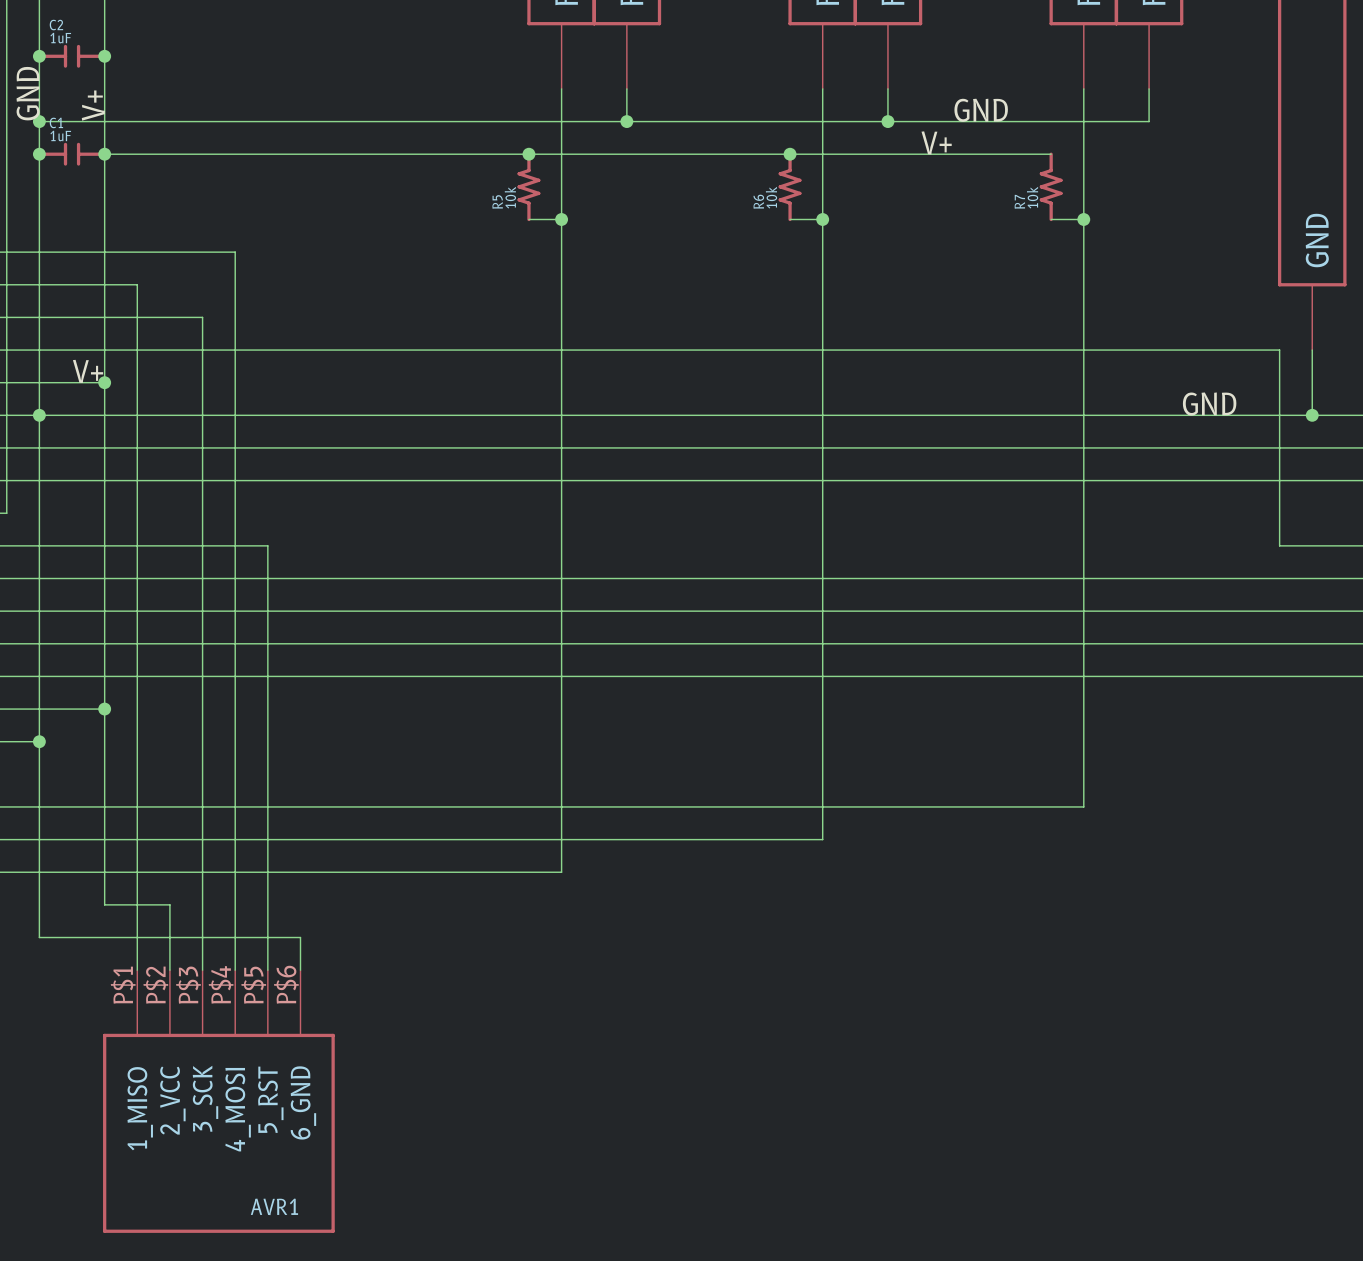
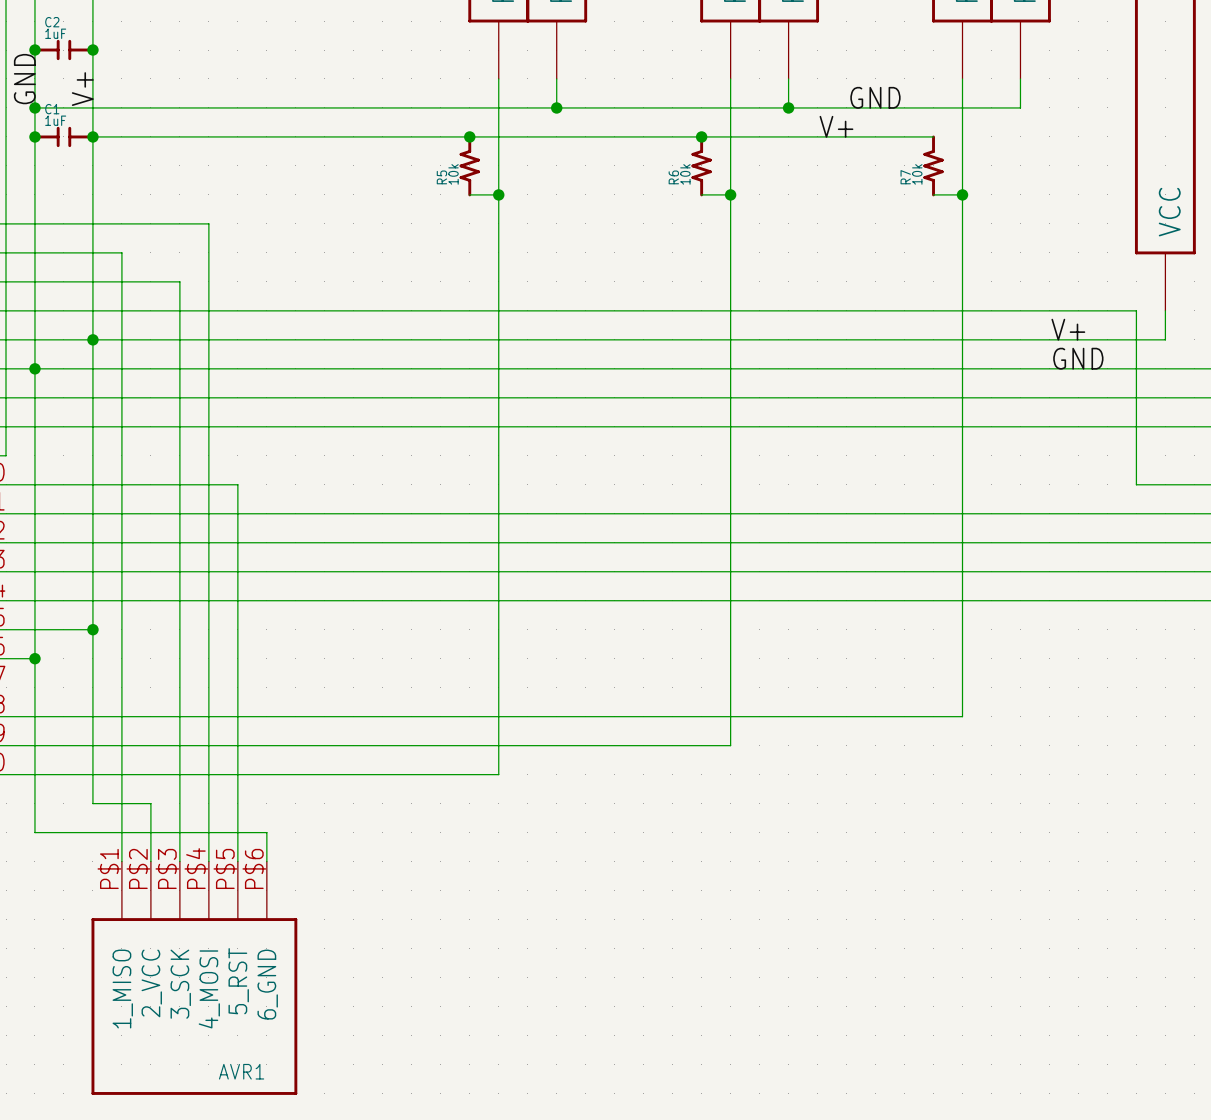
GND name: GND (1317, 240) -> VCC (1169, 212)
label: V+ (88, 371) -> none
label: none -> V+ (1068, 329)
wire: (1312, 382) (1312, 415) -> (1165, 339) (92, 339)
junction: (1312, 415) -> none

